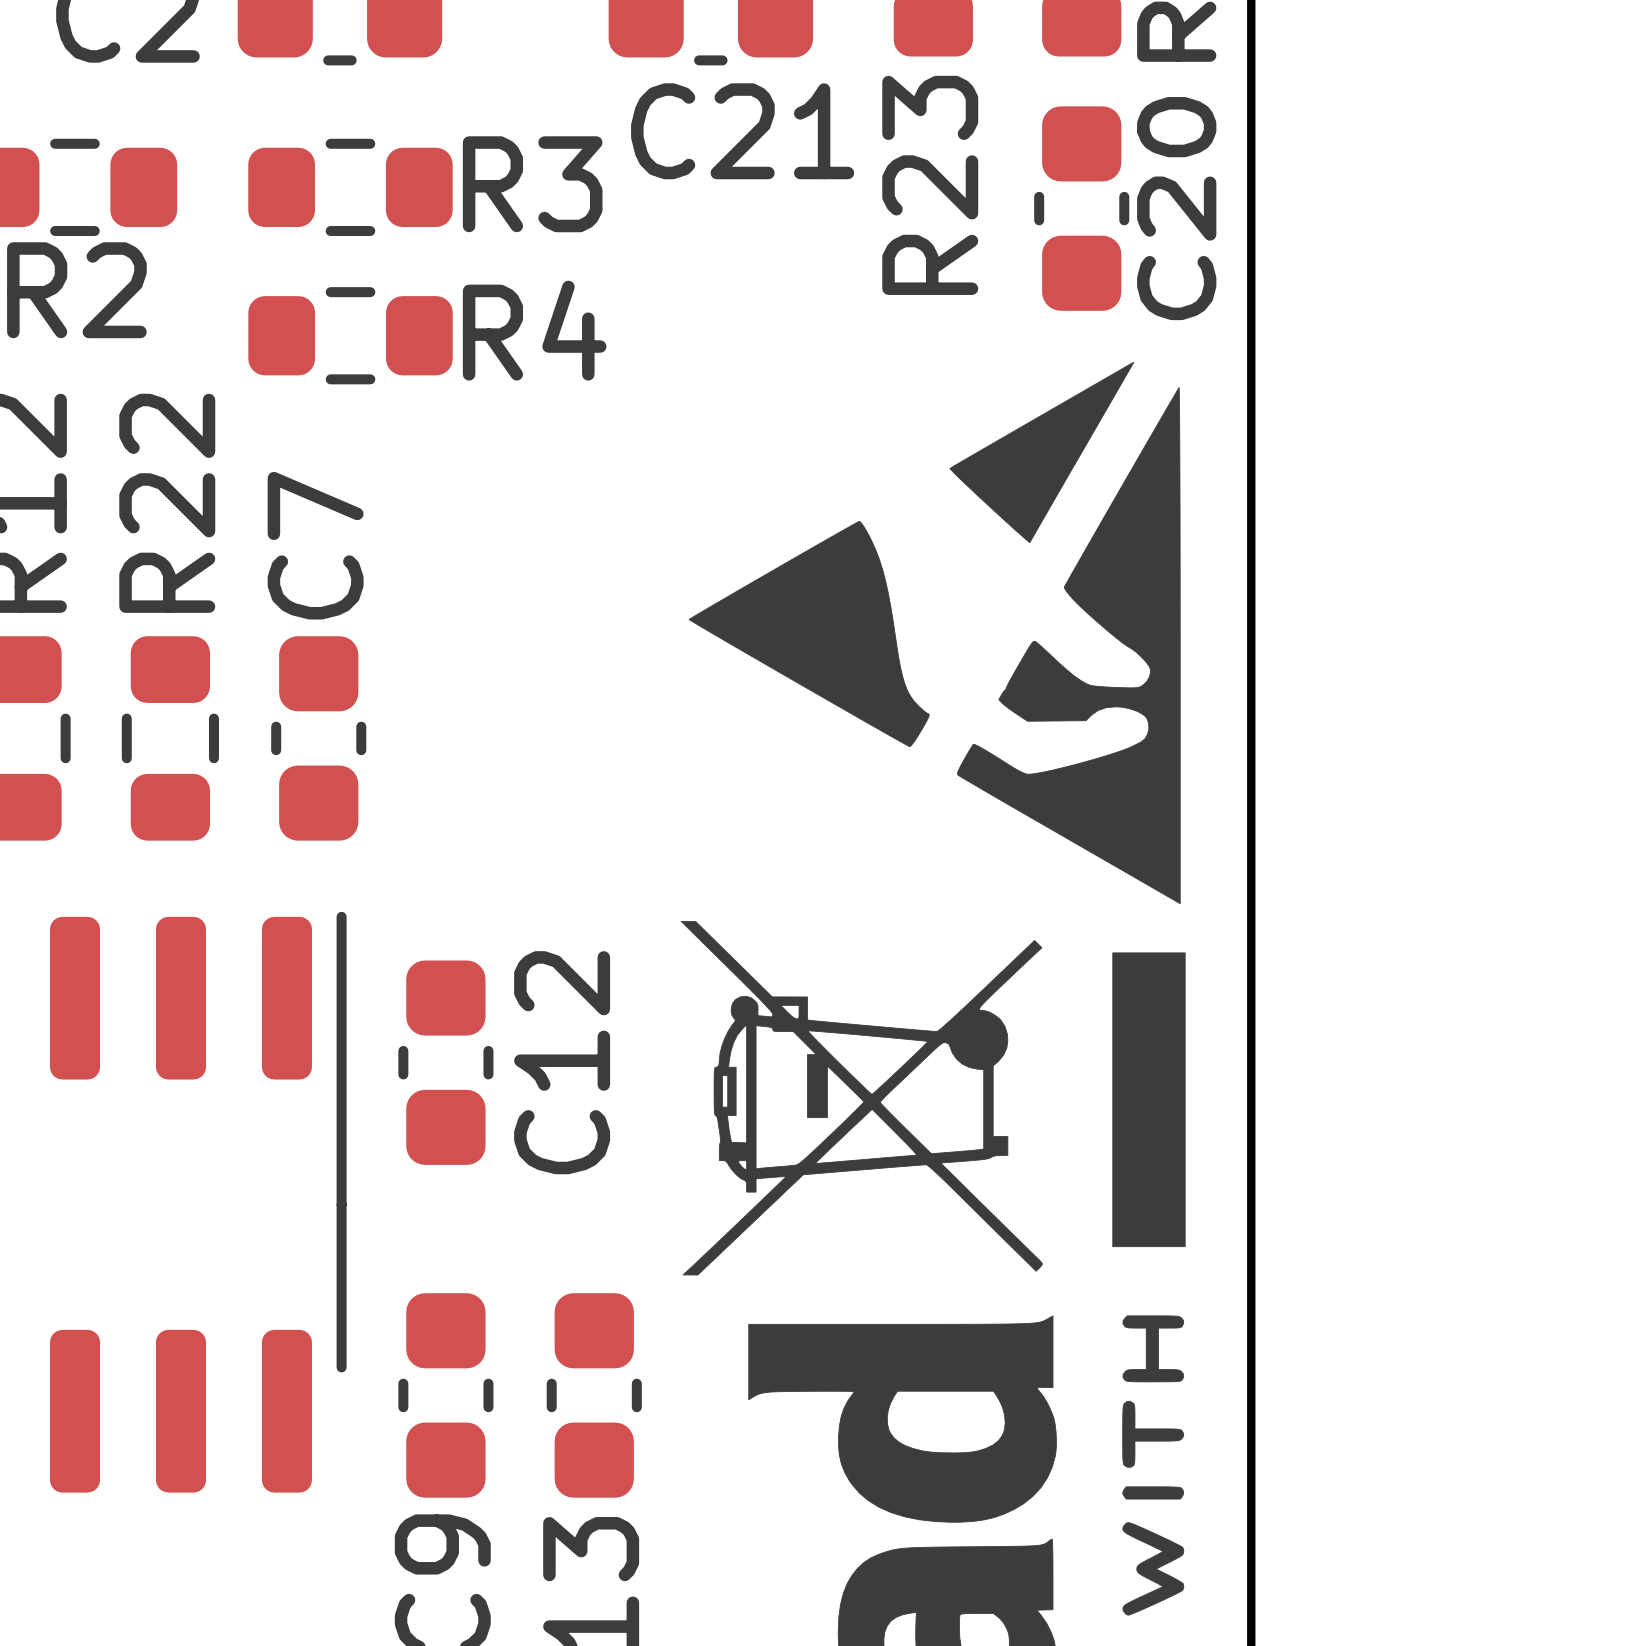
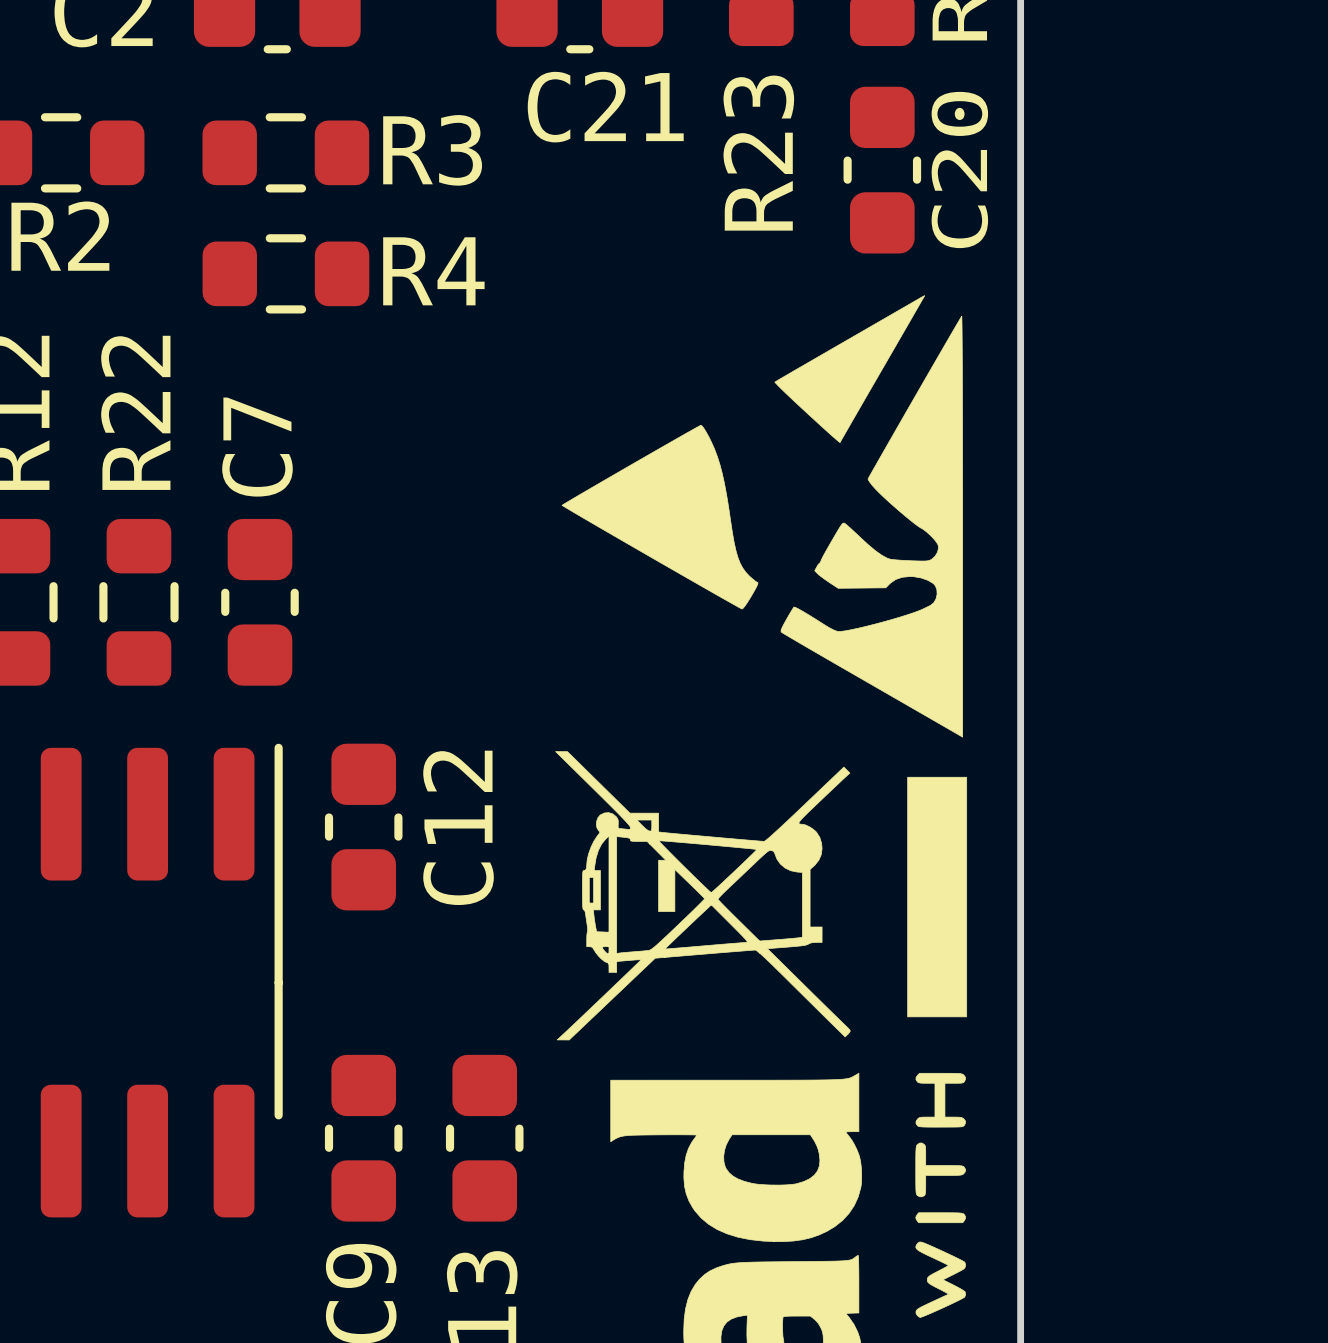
C12 position: (445, 1062) -> (363, 827)

